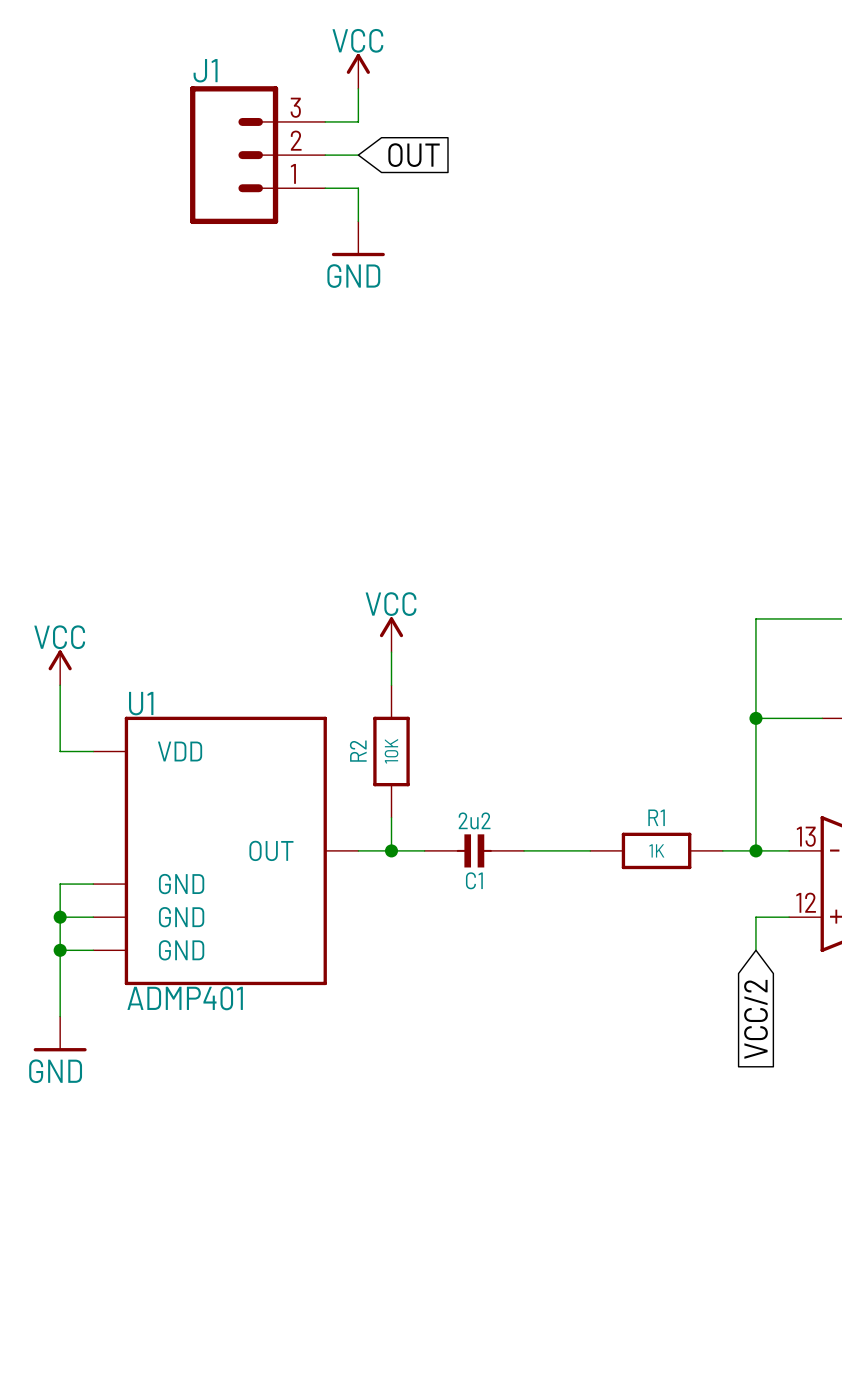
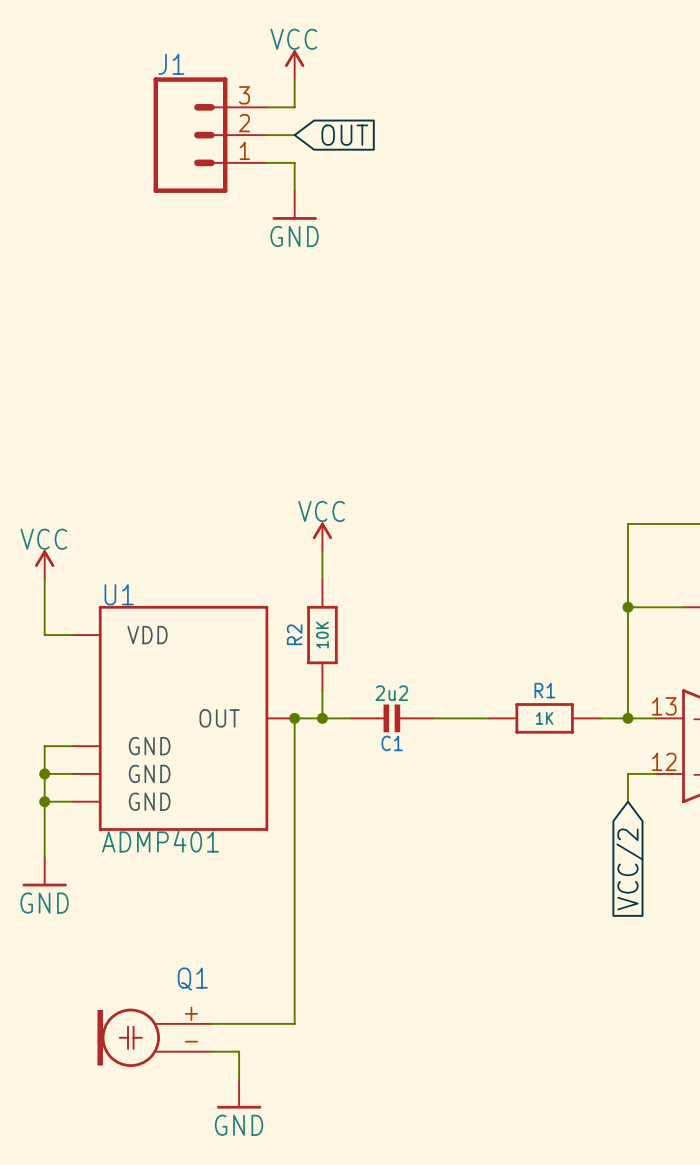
wire: none -> (294, 718) (294, 1023) (211, 1023)
junction: none -> (294, 718)
Q1: none -> (154, 1037)
wire: none -> (211, 1051) (239, 1051) (239, 1079)
power symbol: none -> GND (239, 1094)

